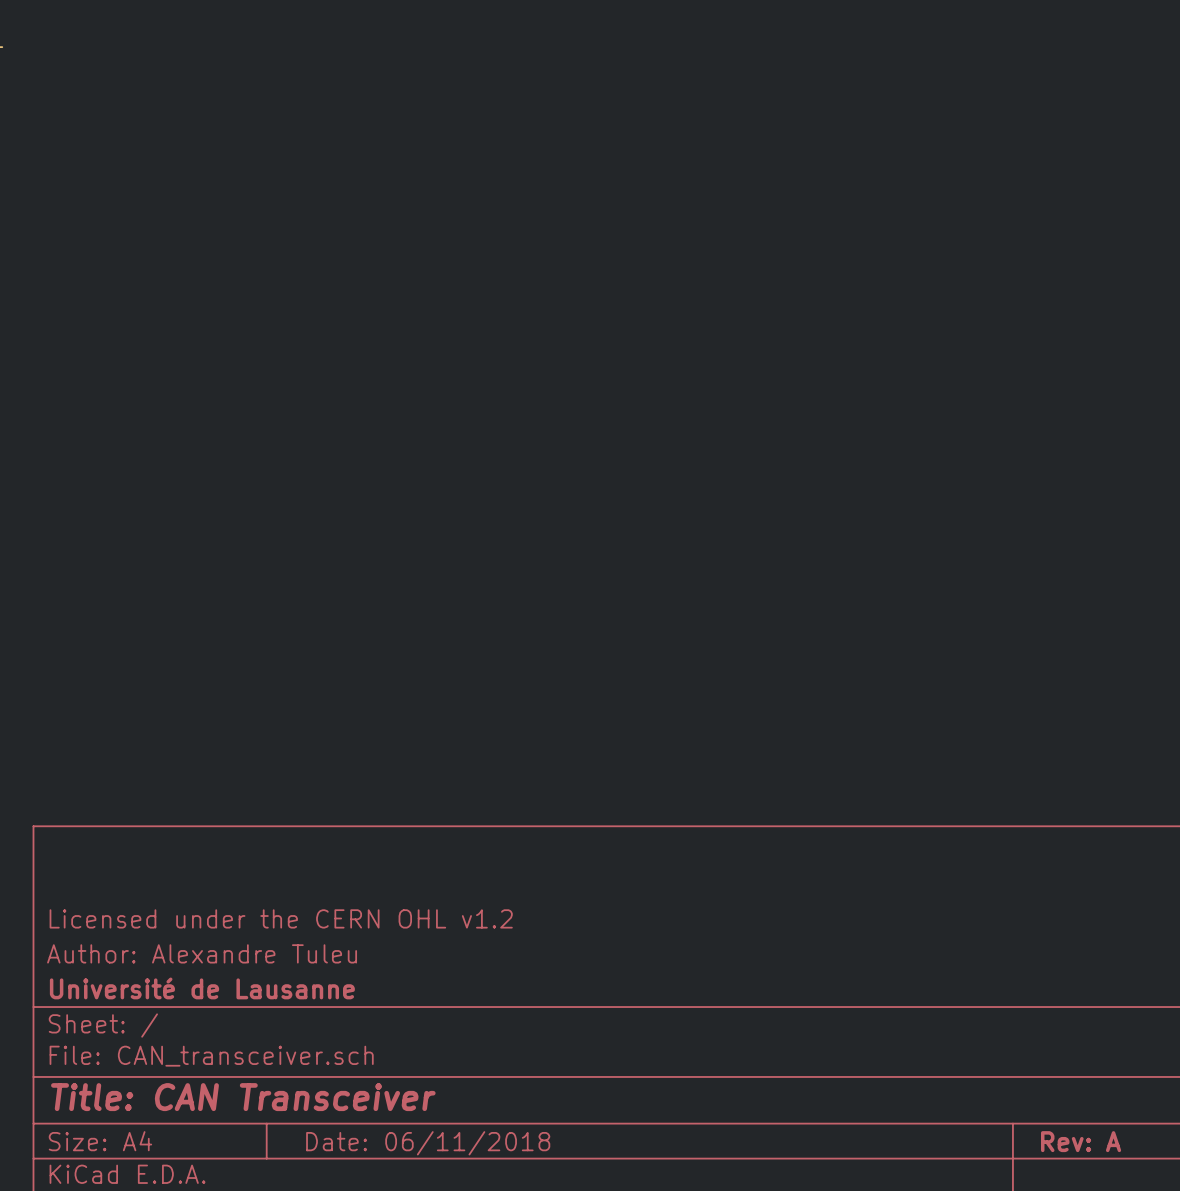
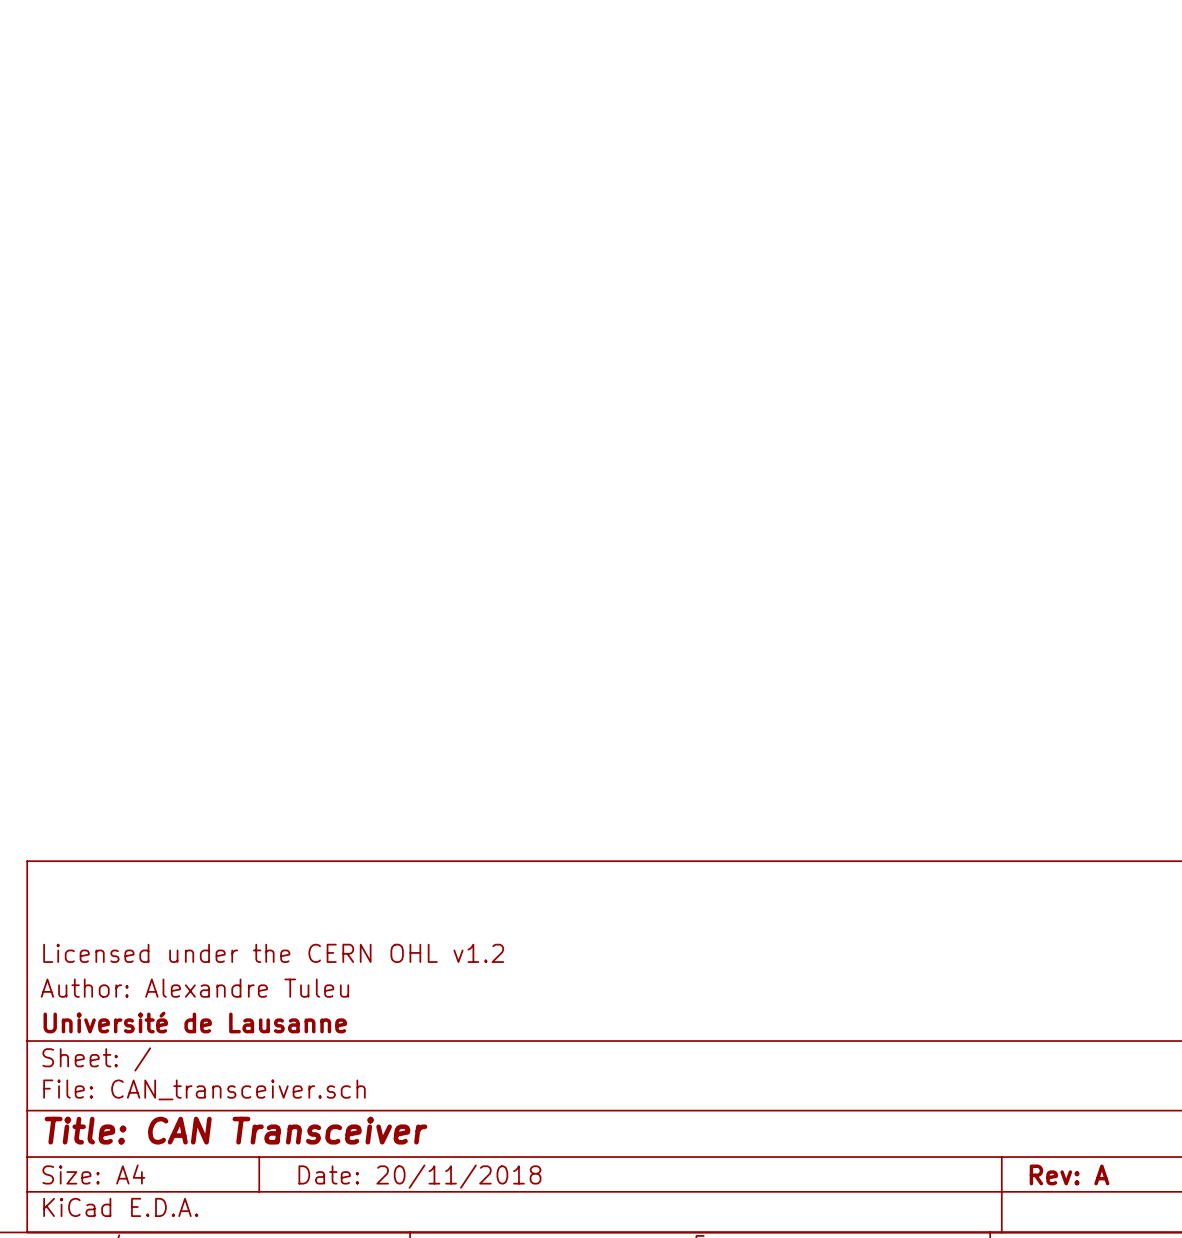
title block: Date: 06/11/2018 (428, 1143) -> Date: 20/11/2018 (419, 1176)

